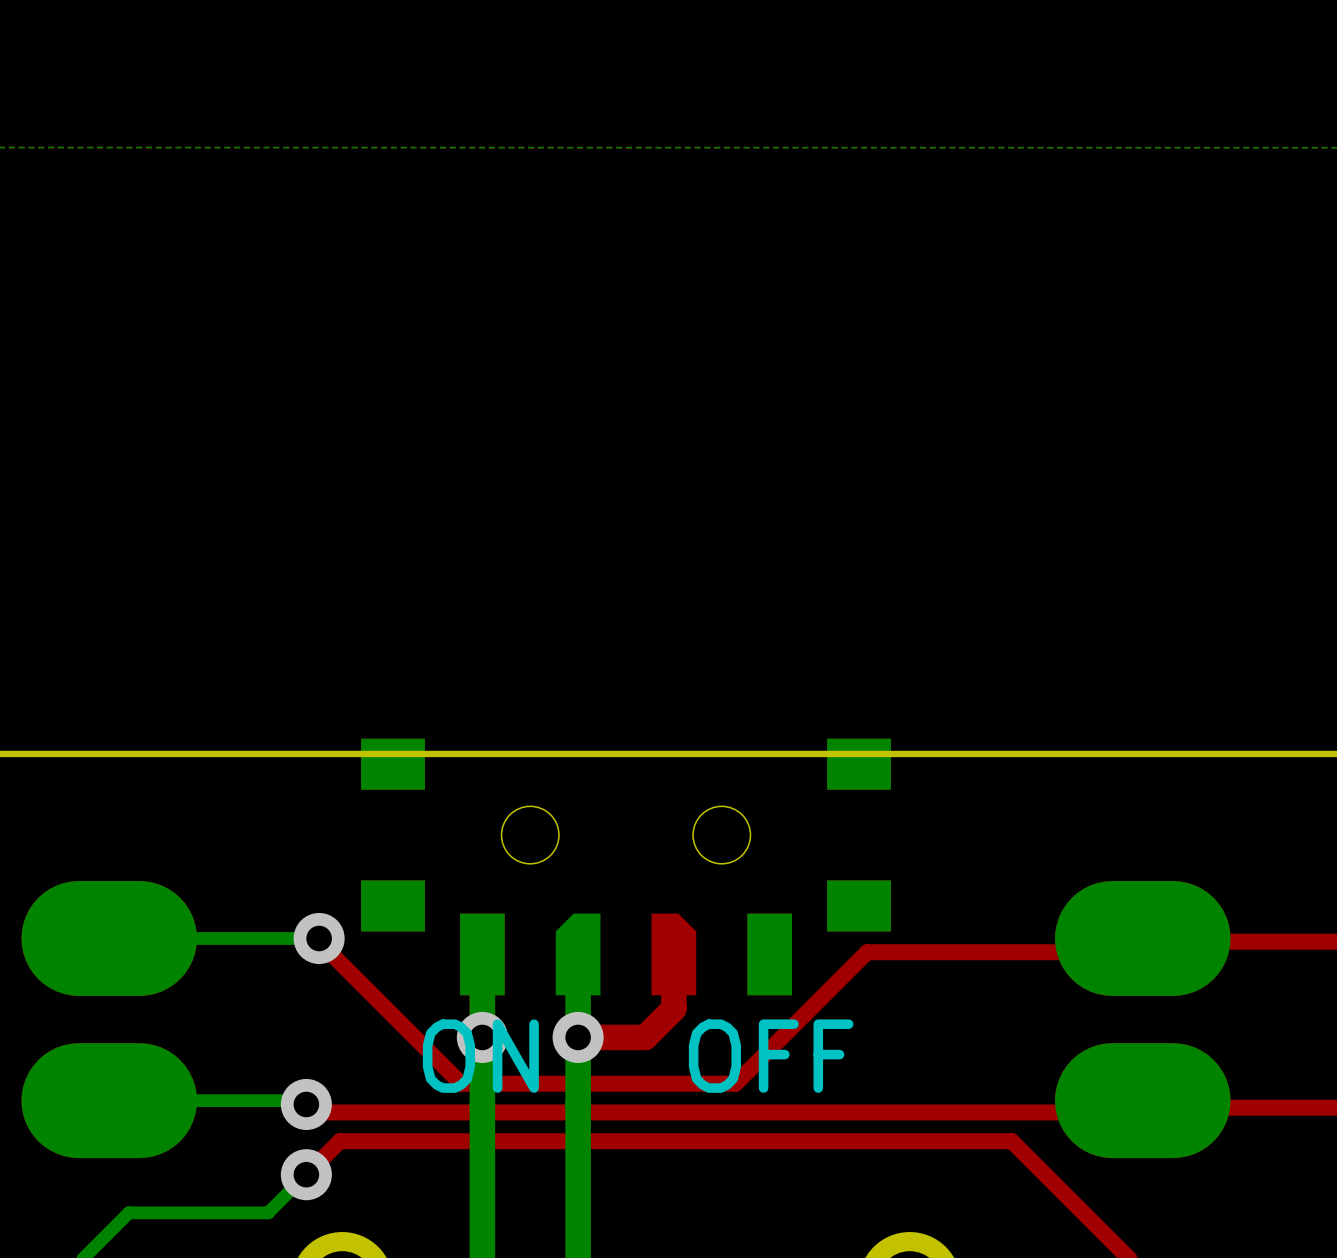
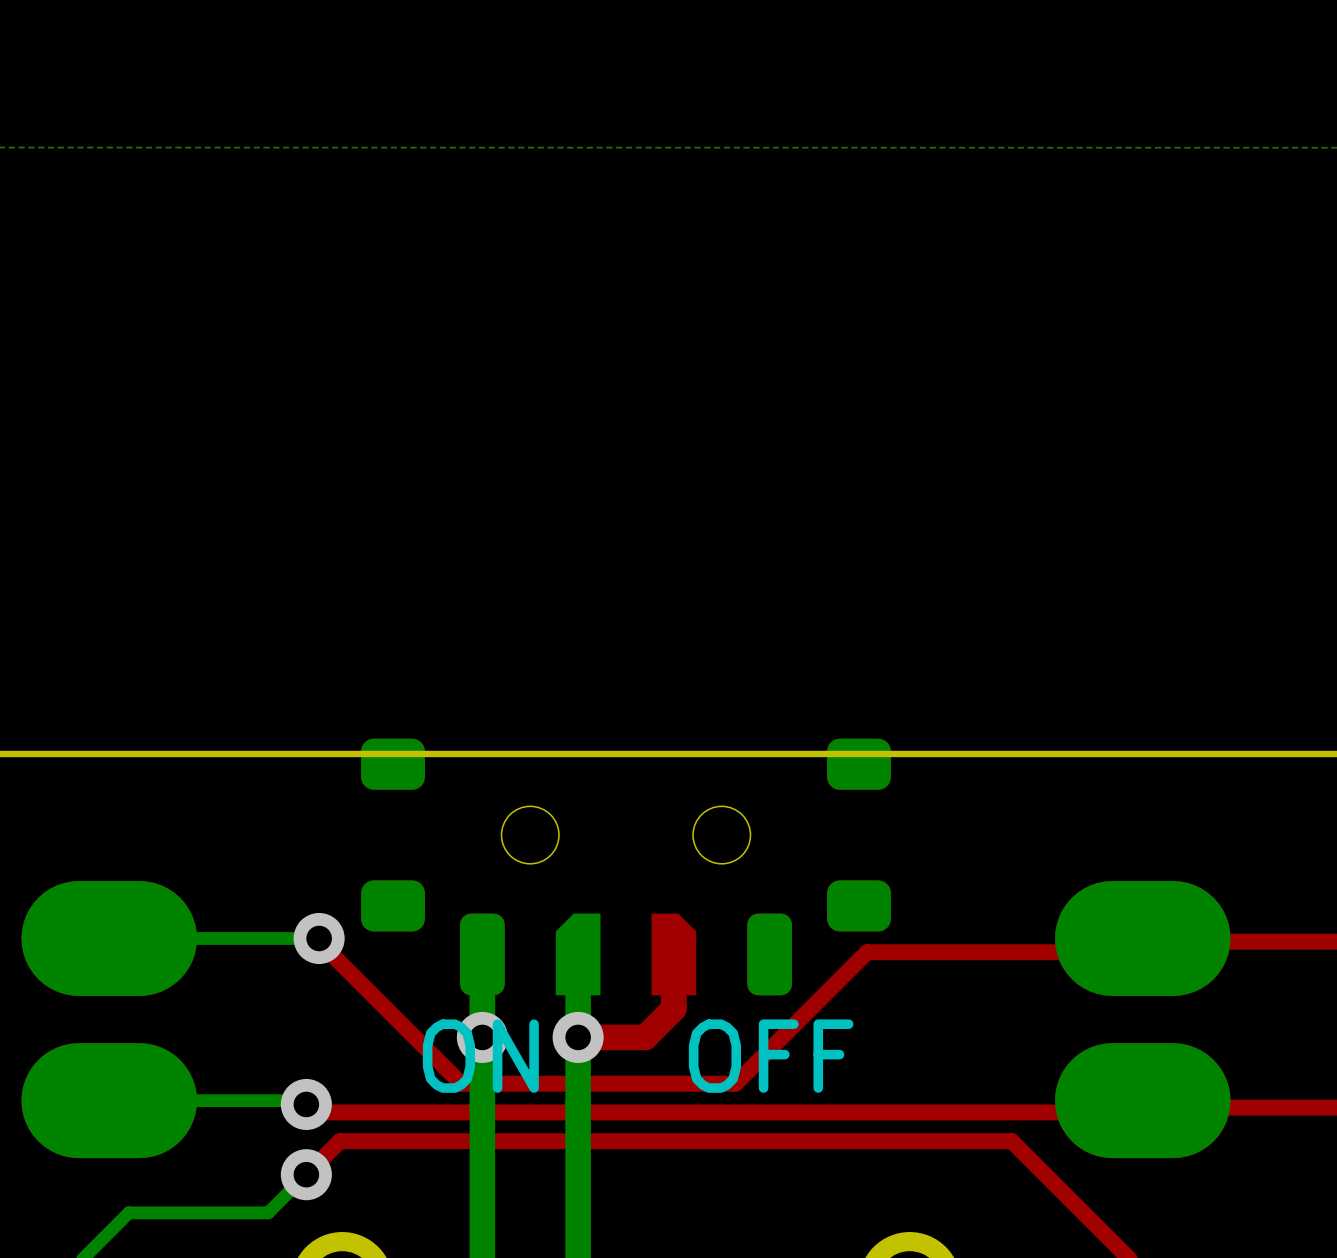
part footprint: [361, 738, 891, 996] -> [361, 738, 891, 996]

